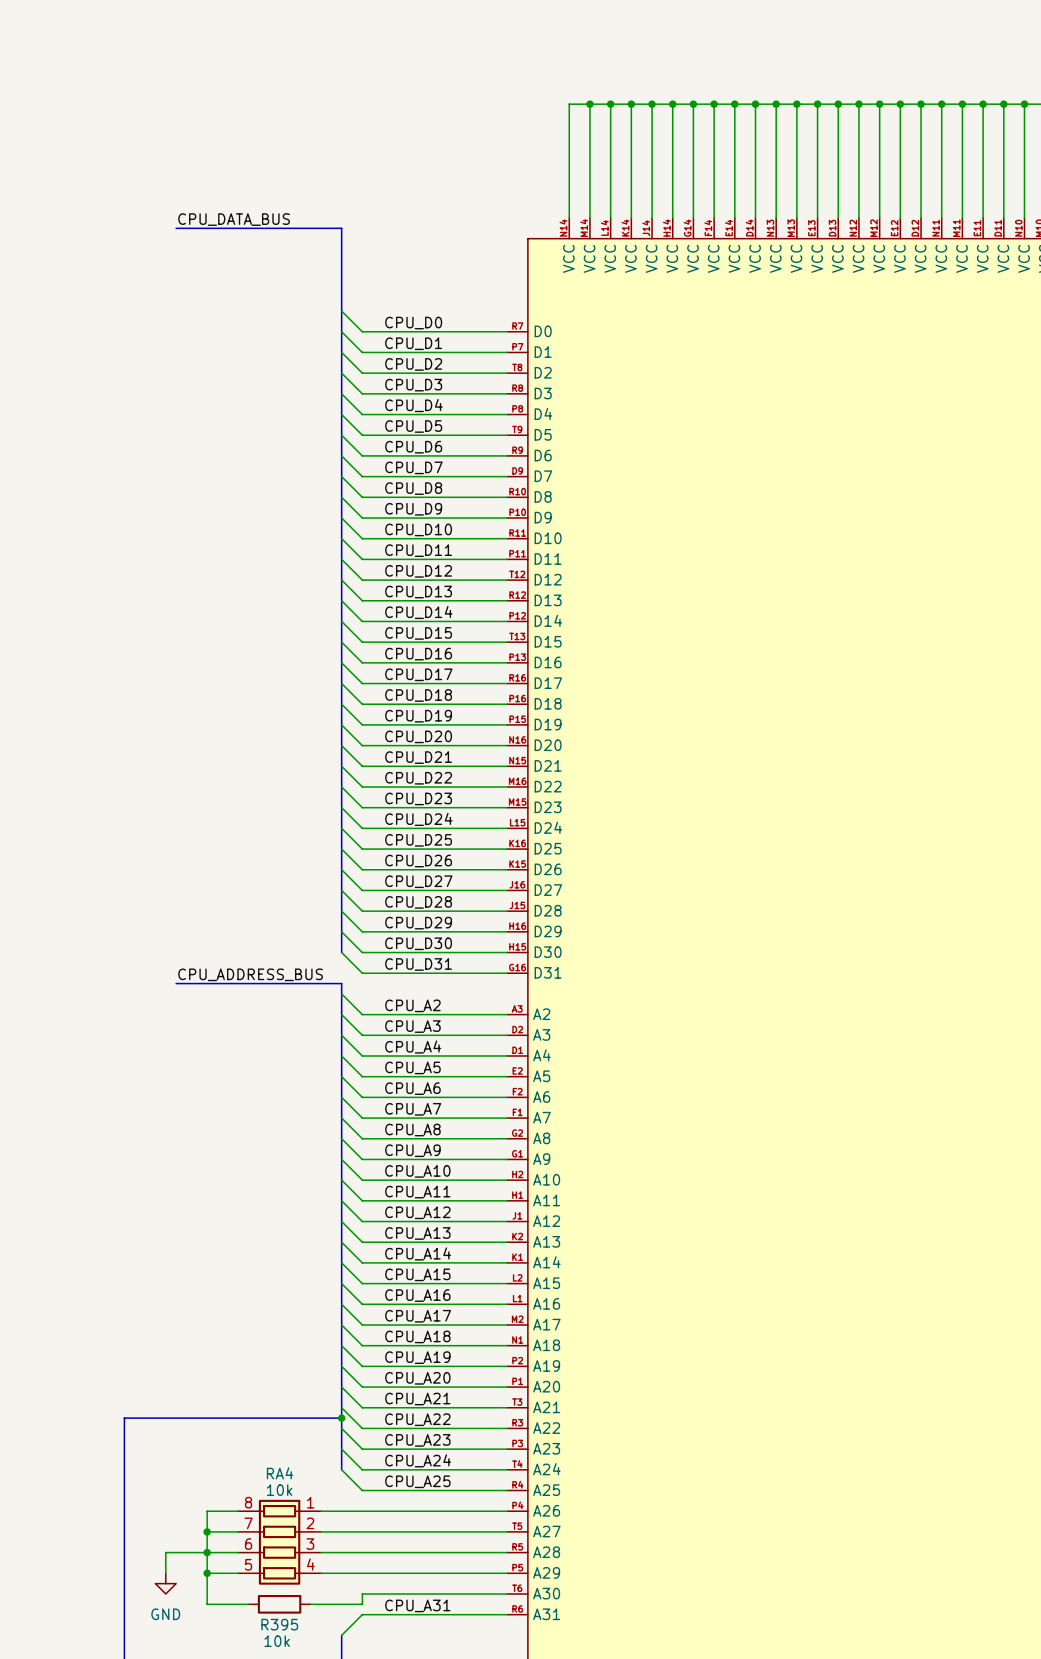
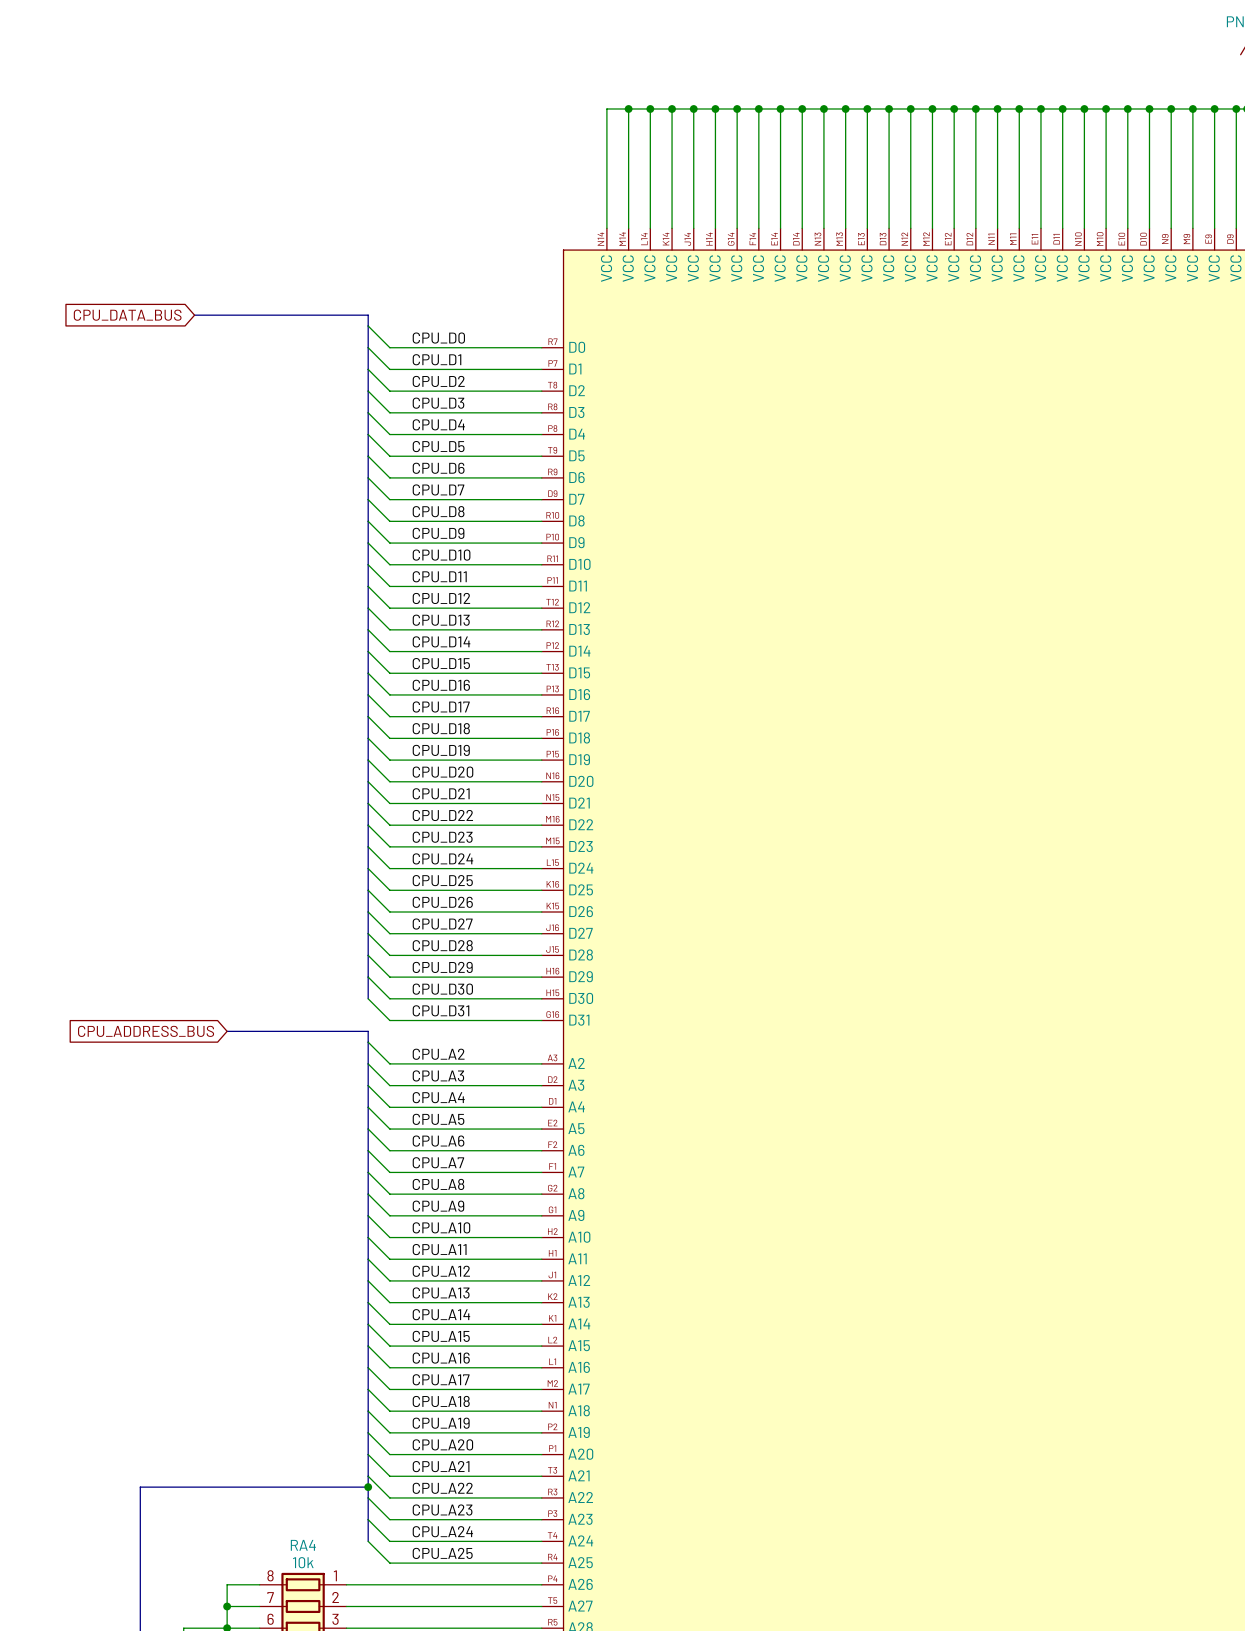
label: CPU_DATA_BUS (234, 219) -> none
bus: (176, 228) (341, 228) (341, 300) -> (194, 315) (368, 315)
global label: none -> CPU_DATA_BUS (127, 315)
label: CPU_ADDRESS_BUS (250, 974) -> none
bus: (176, 983) (207, 983) -> none
global label: none -> CPU_ADDRESS_BUS (146, 1031)

